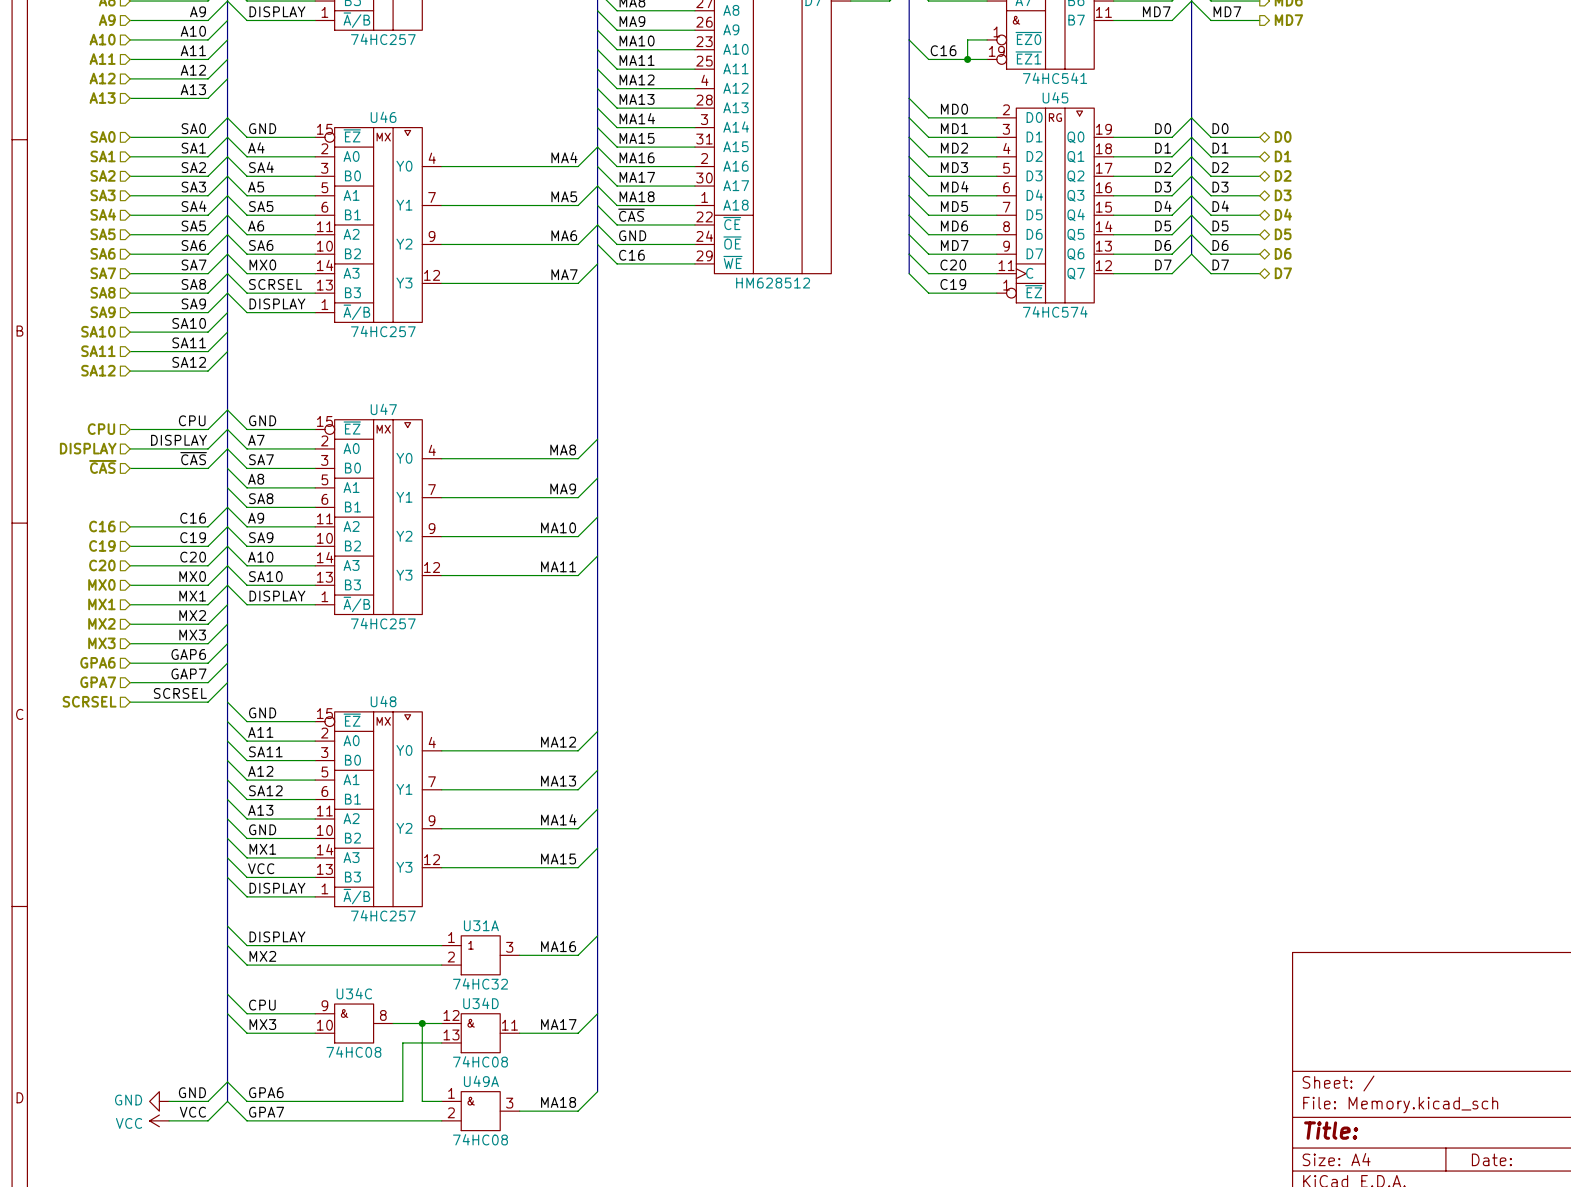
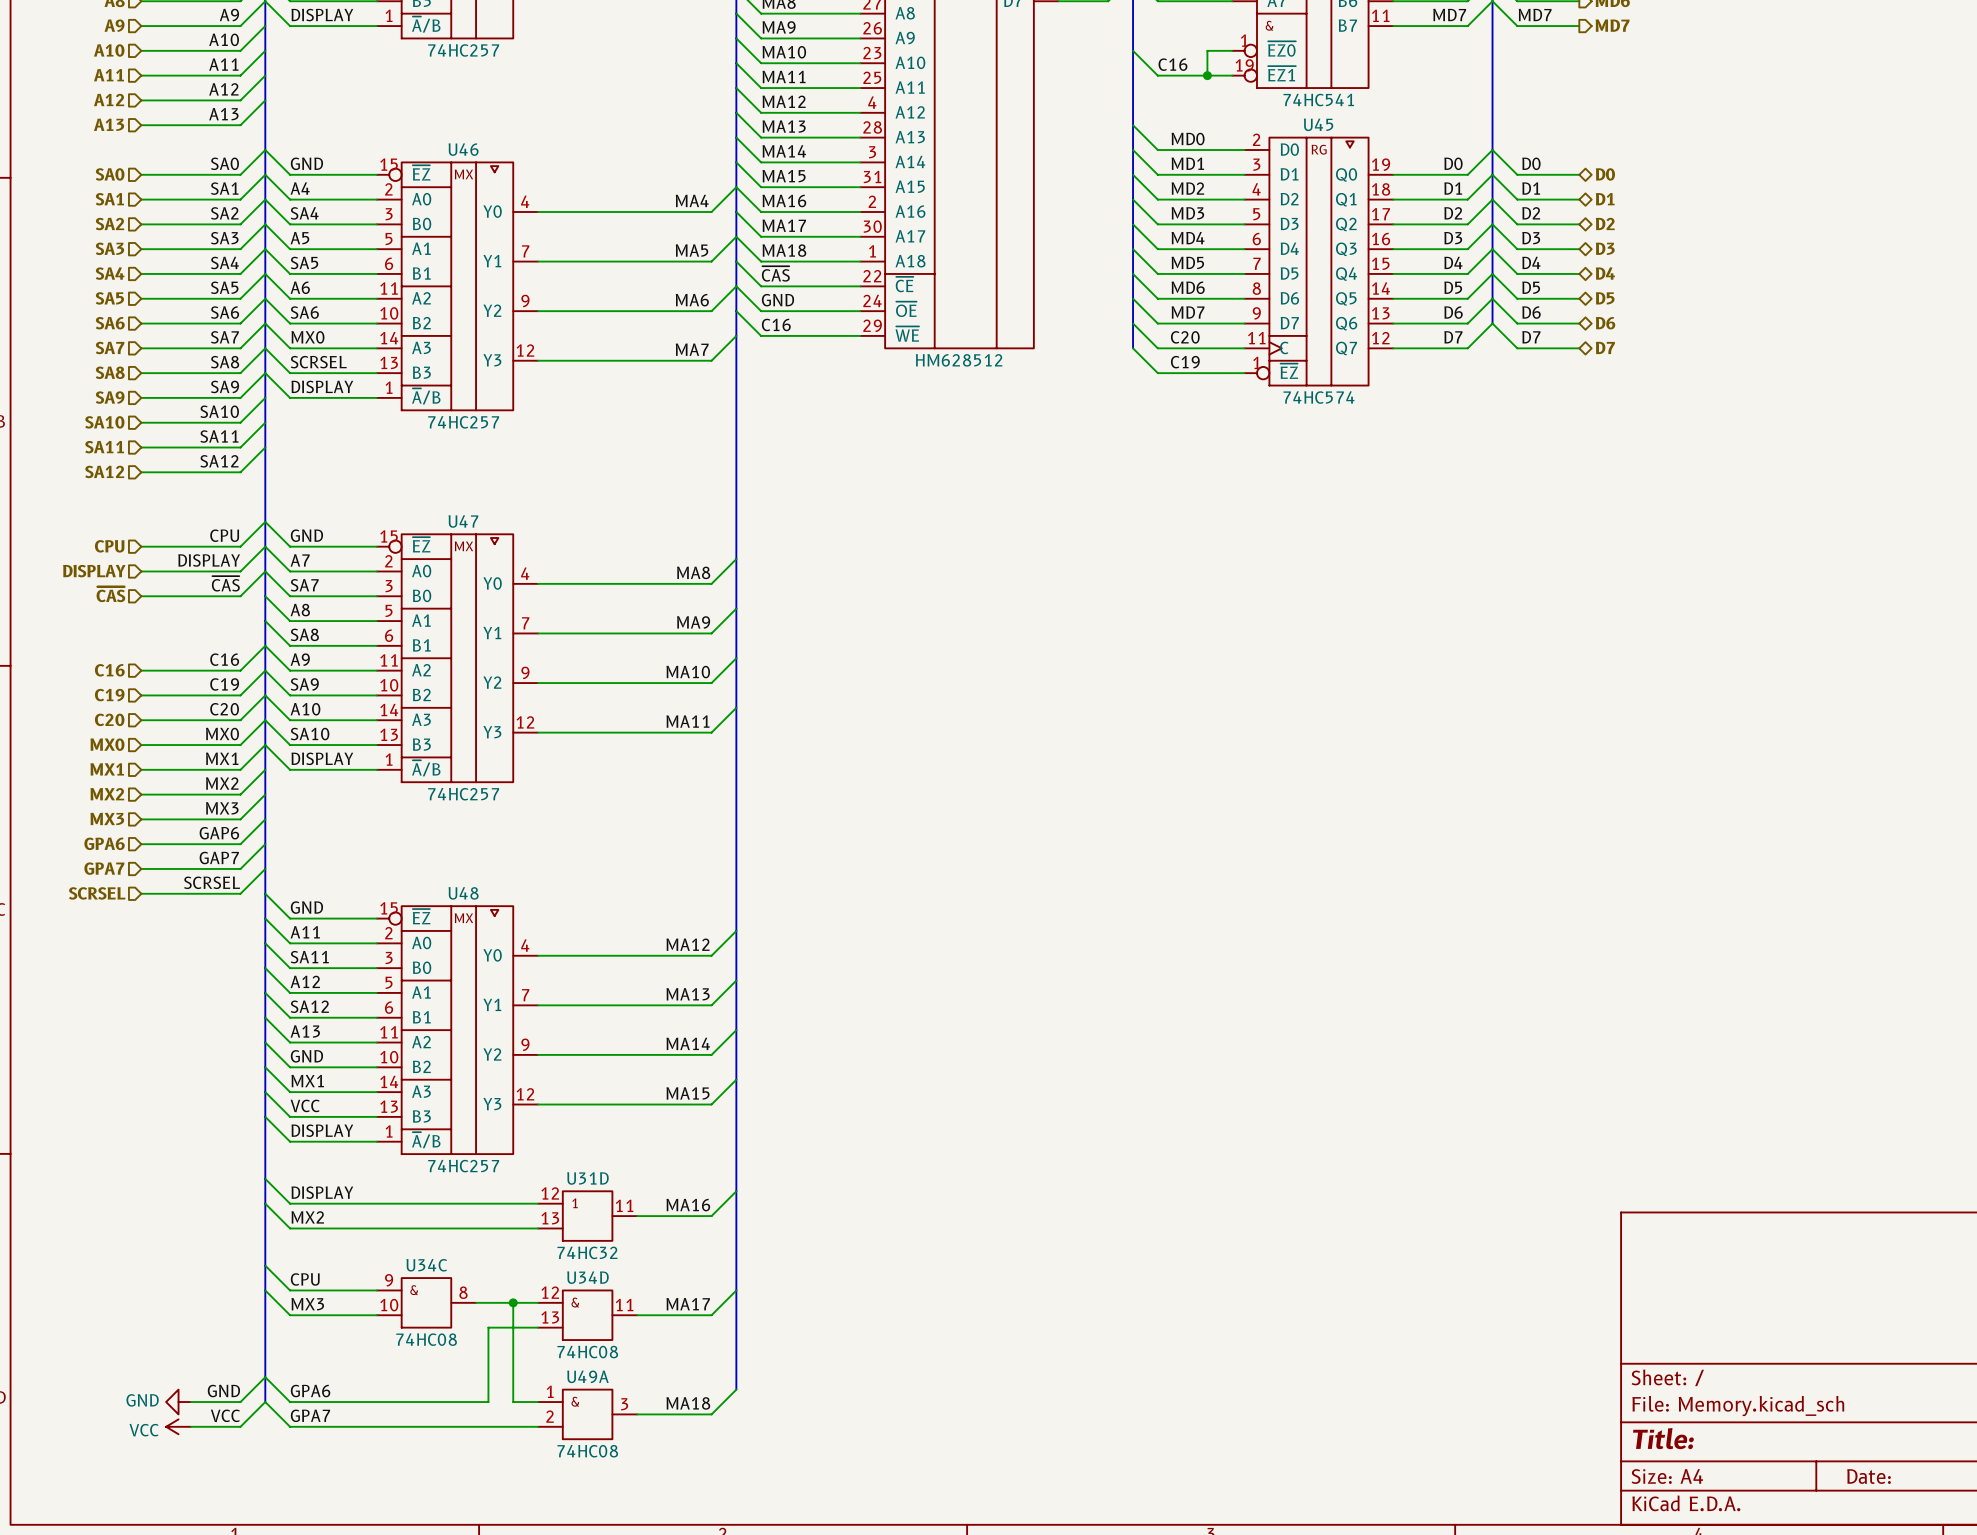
U31A name: U31A (481, 925) -> U31D (587, 1178)
U31A pin number: 1 (451, 937) -> 12 (550, 1193)
U31A pin number: 3 (509, 947) -> 11 (624, 1205)
U31A pin number: 2 (451, 957) -> 13 (550, 1218)

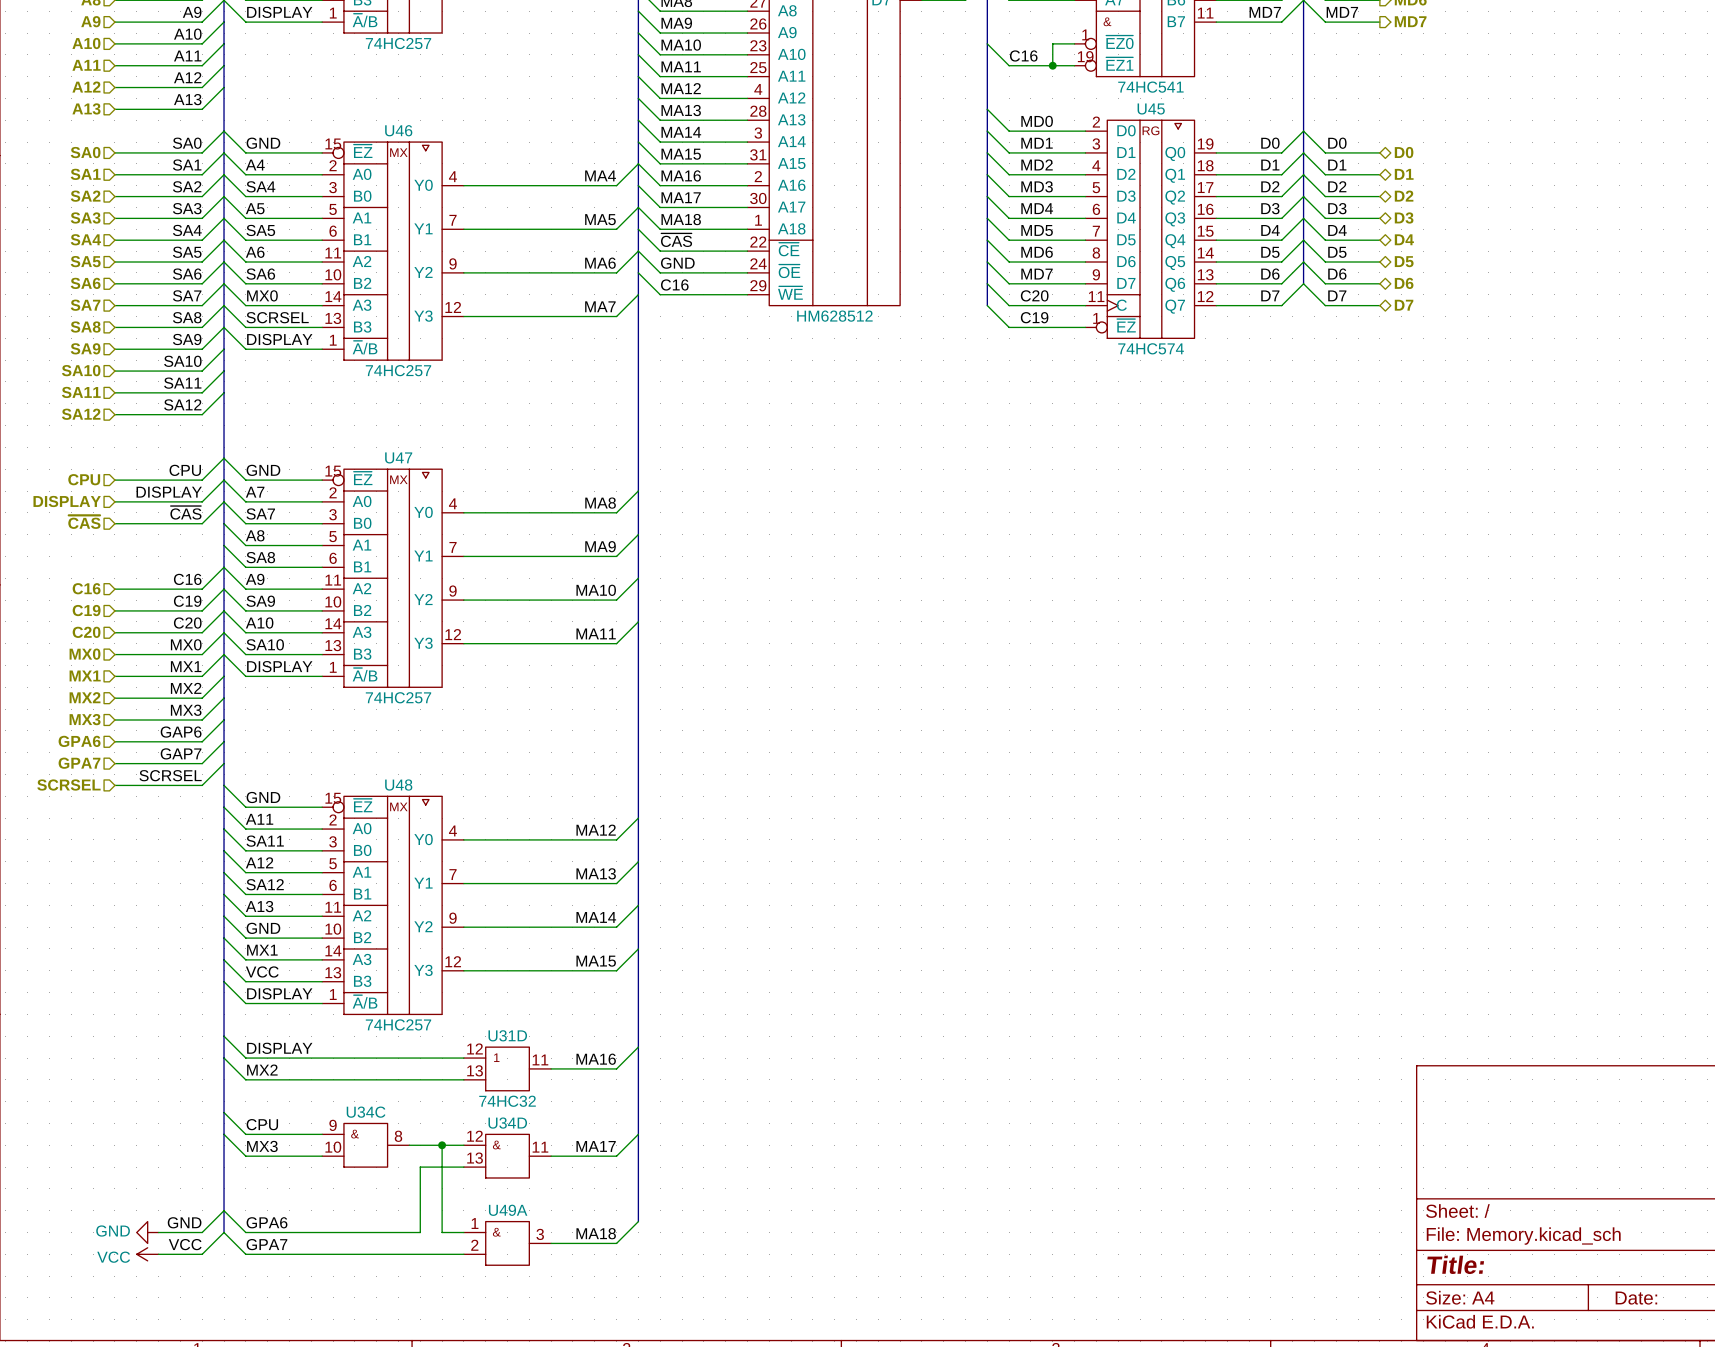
U34C value: 74HC08 (426, 1339) -> none
U34D value: 74HC08 (587, 1352) -> none
U49A value: 74HC08 (587, 1451) -> none

